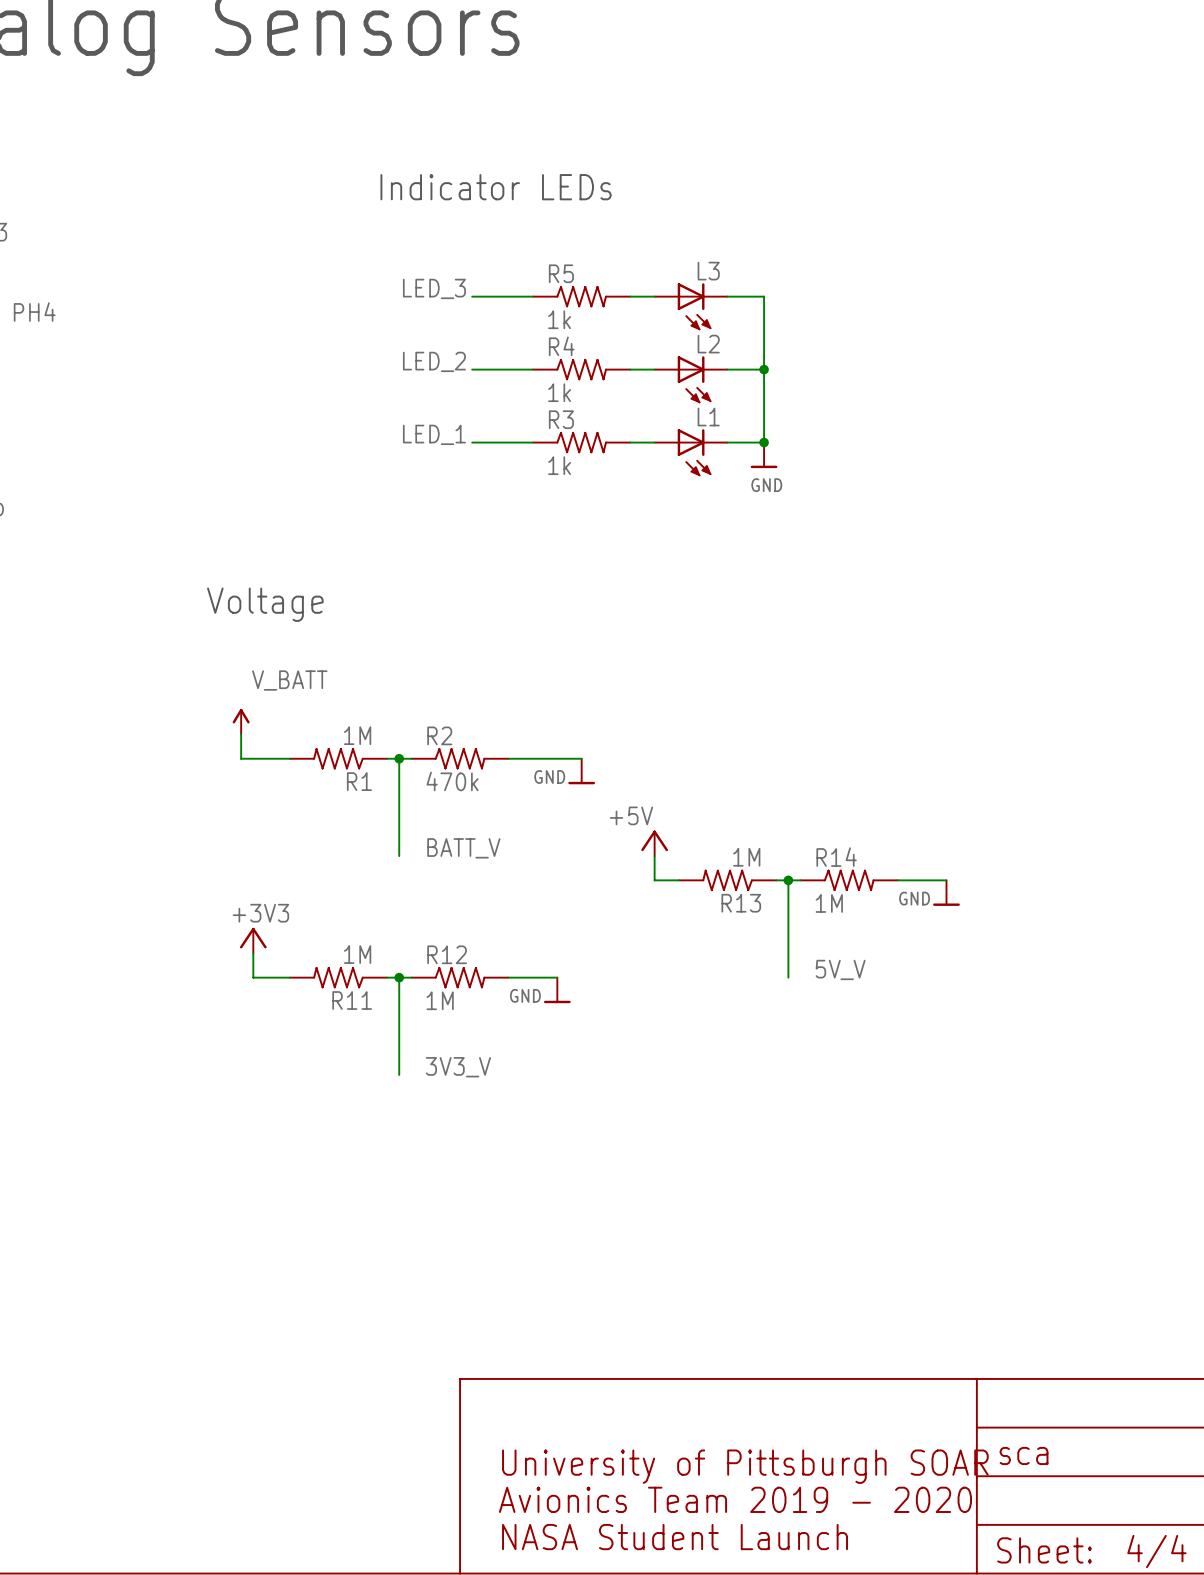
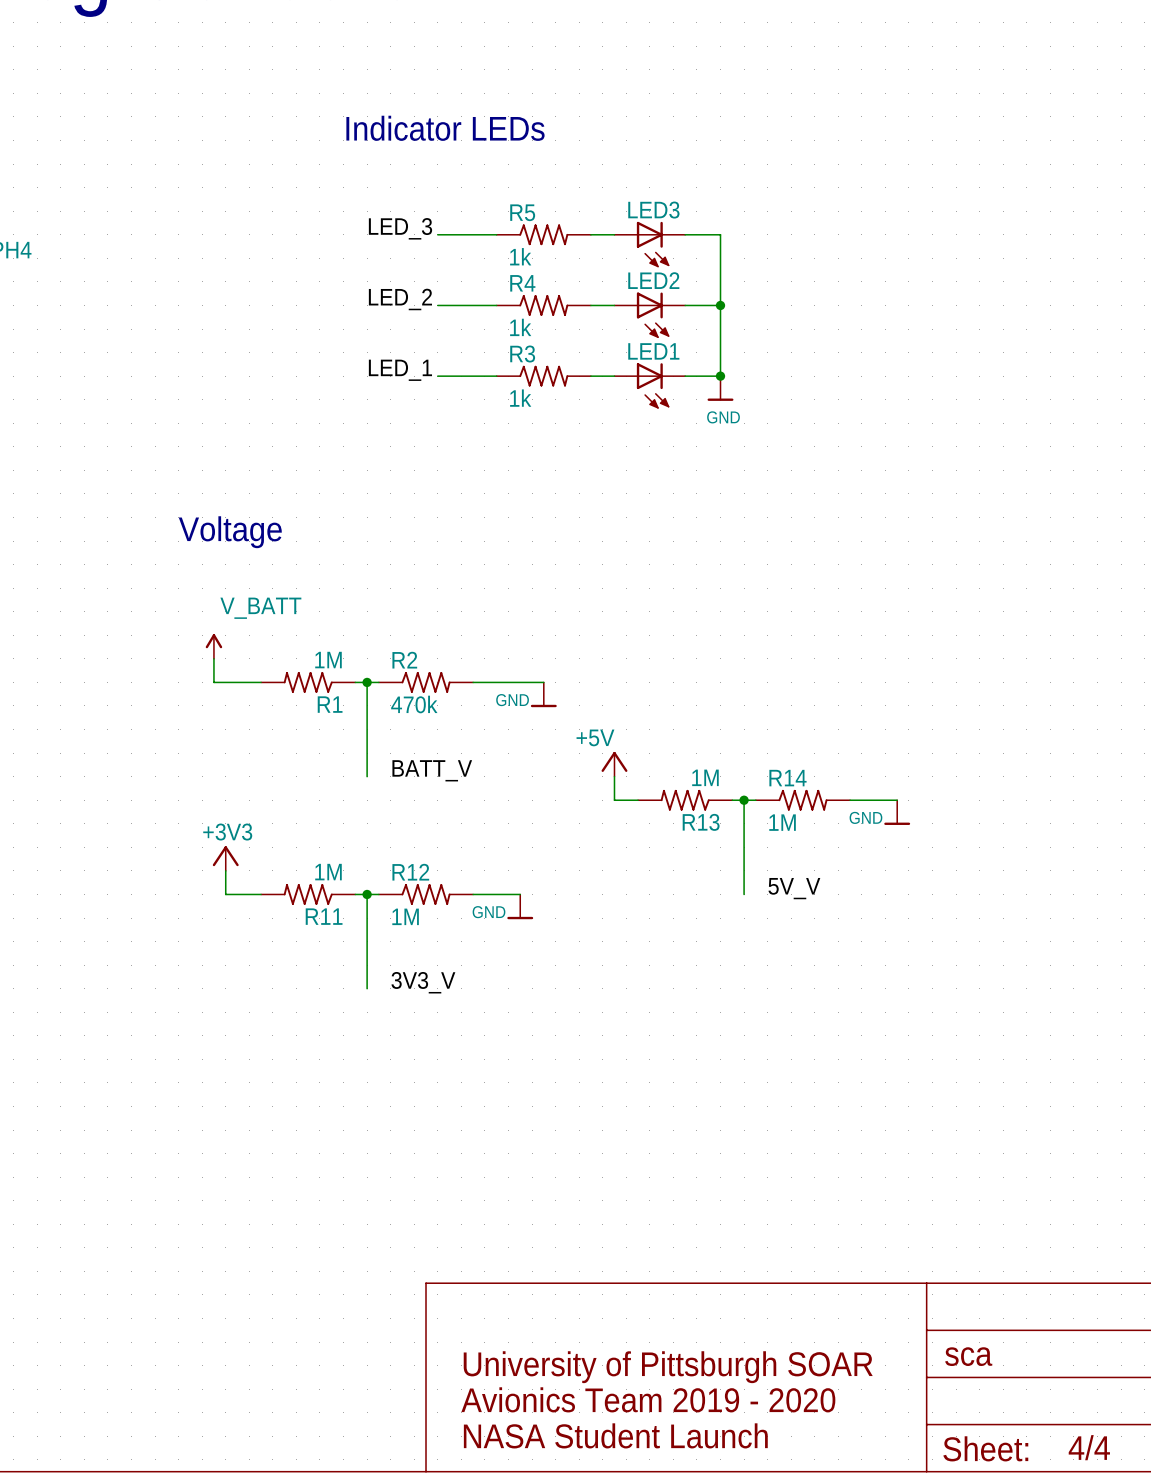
L3 name: L3 (708, 271) -> LED3 (653, 210)
L2 name: L2 (708, 344) -> LED2 (653, 280)
L1 name: L1 (708, 417) -> LED1 (653, 351)

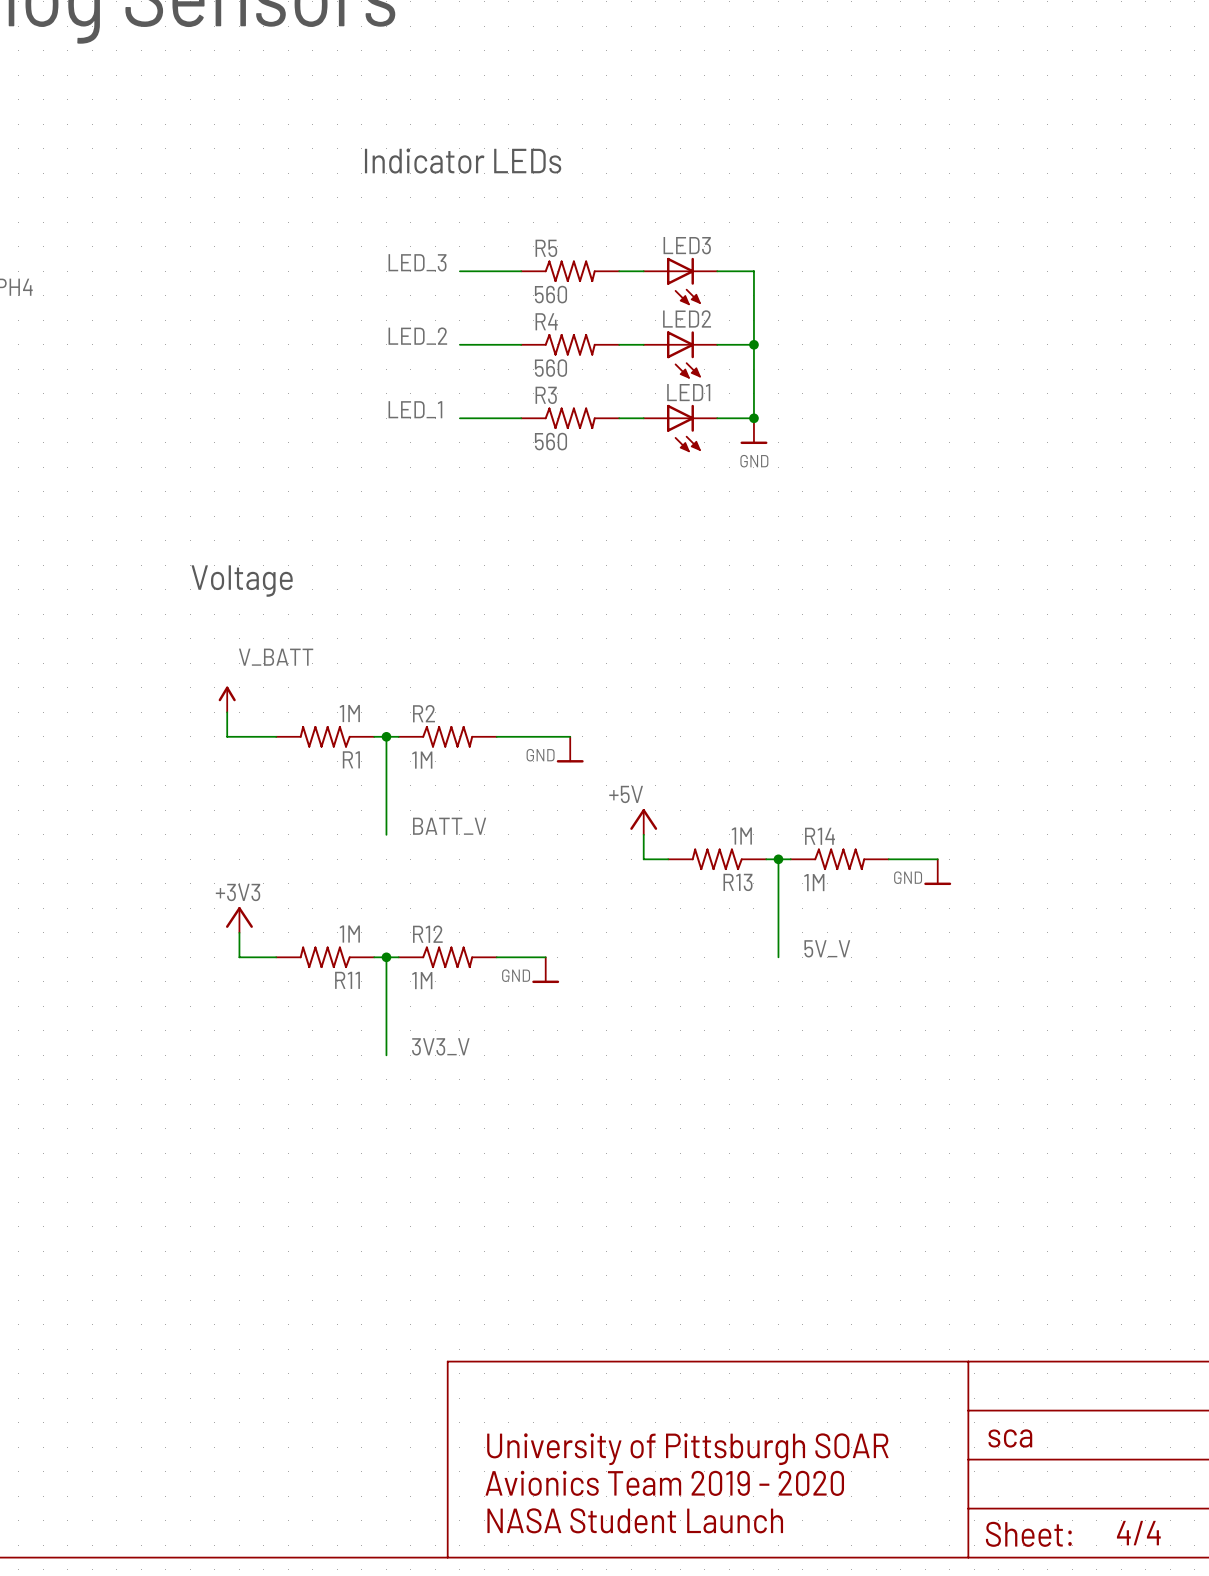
R5 value: 1k (520, 256) -> 560 (550, 294)
R4 value: 1k (520, 327) -> 560 (550, 368)
R3 value: 1k (520, 398) -> 560 (550, 441)
R2 value: 470k (414, 704) -> 1M (422, 760)

